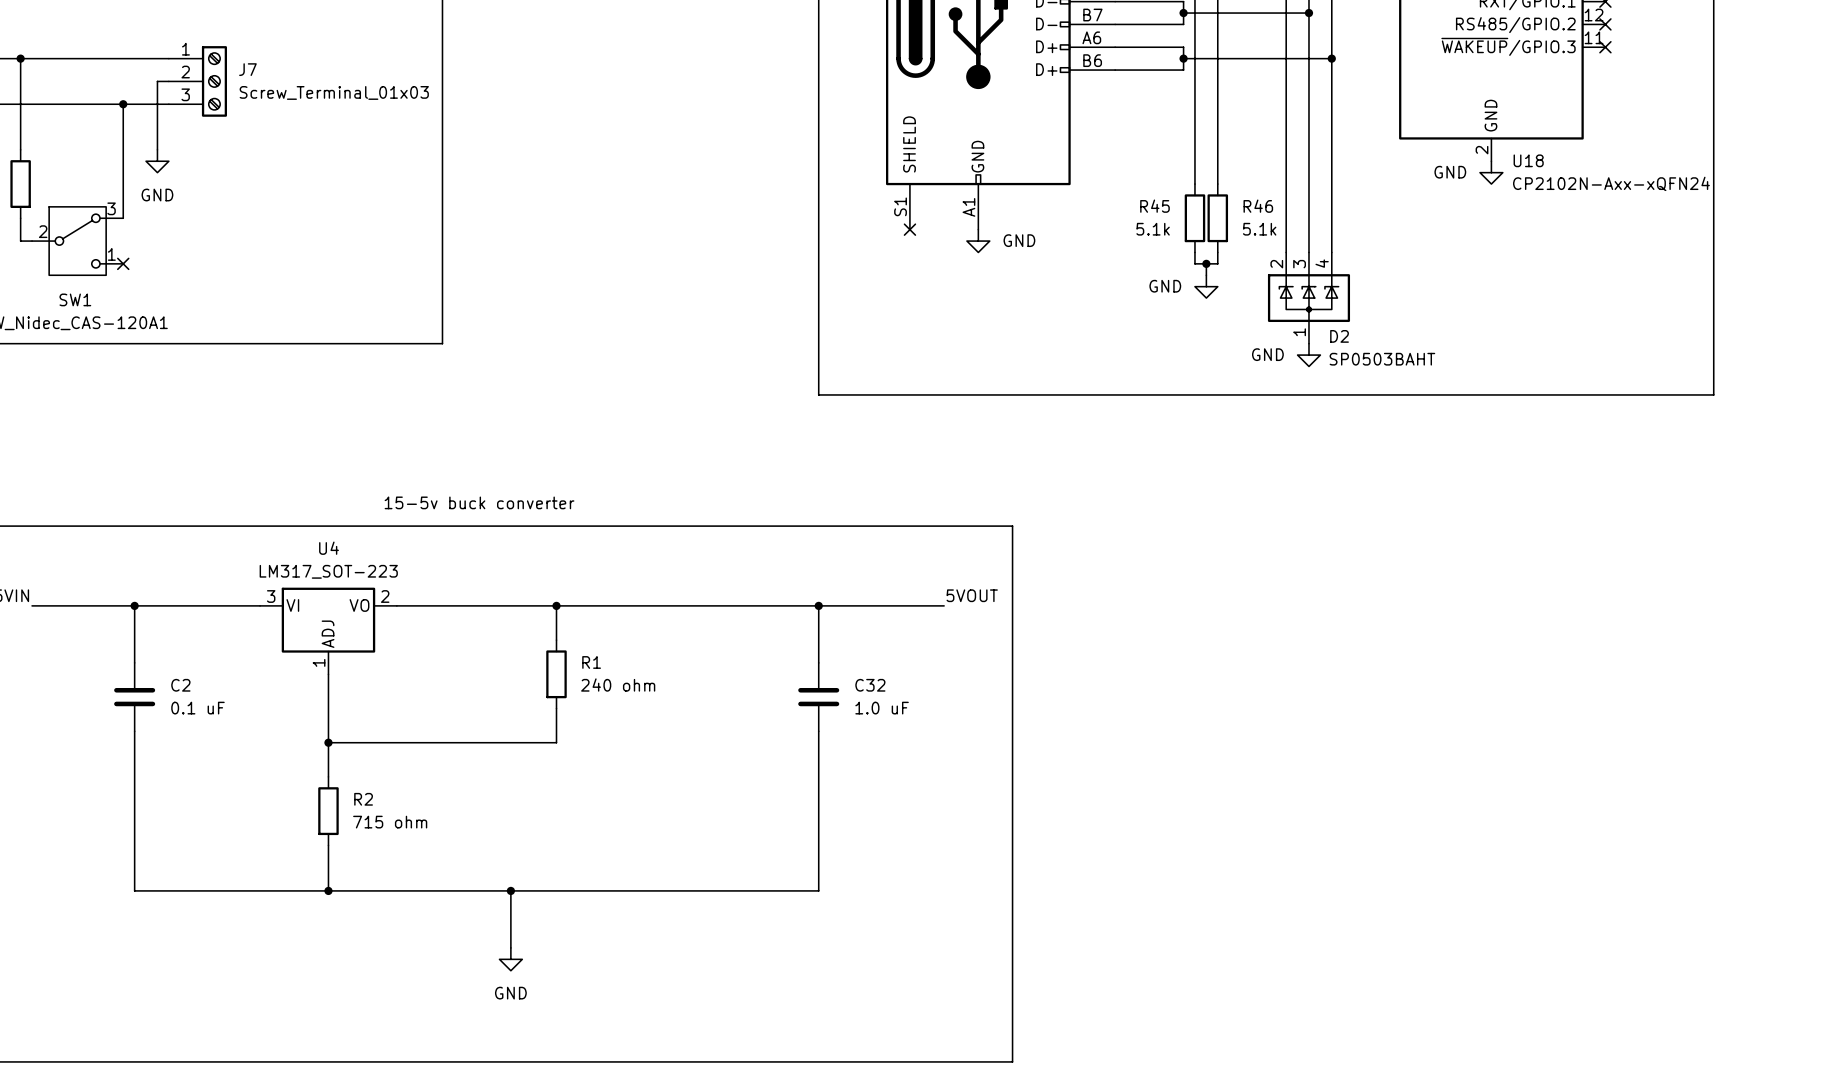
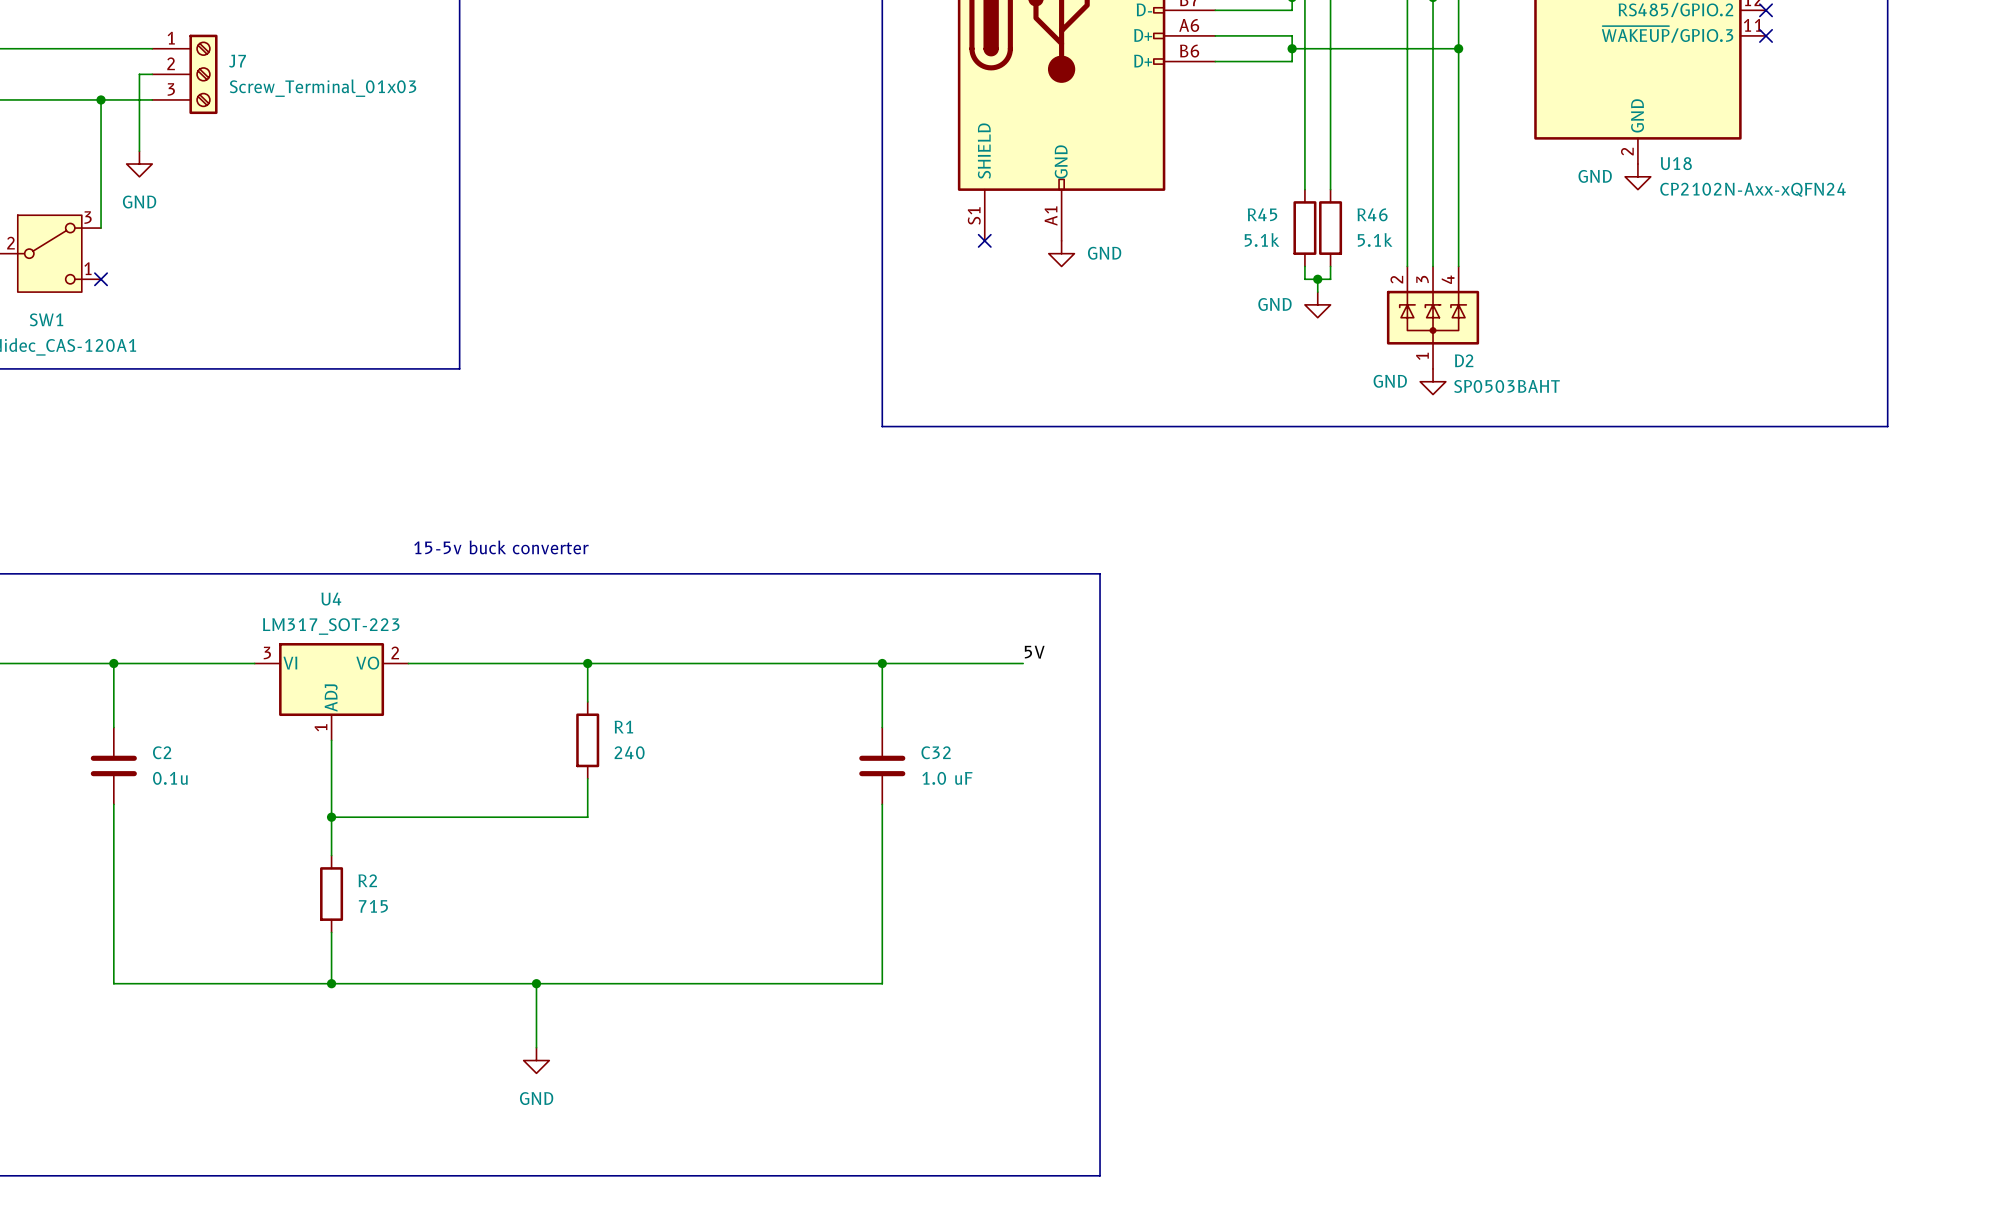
label: 5VOUT (972, 595) -> 5V (1034, 652)
R1 value: 240 ohm (618, 685) -> 240 (629, 752)
C2 value: 0.1 uF (197, 708) -> 0.1u (170, 778)
R2 value: 715 ohm (390, 822) -> 715 (373, 906)

